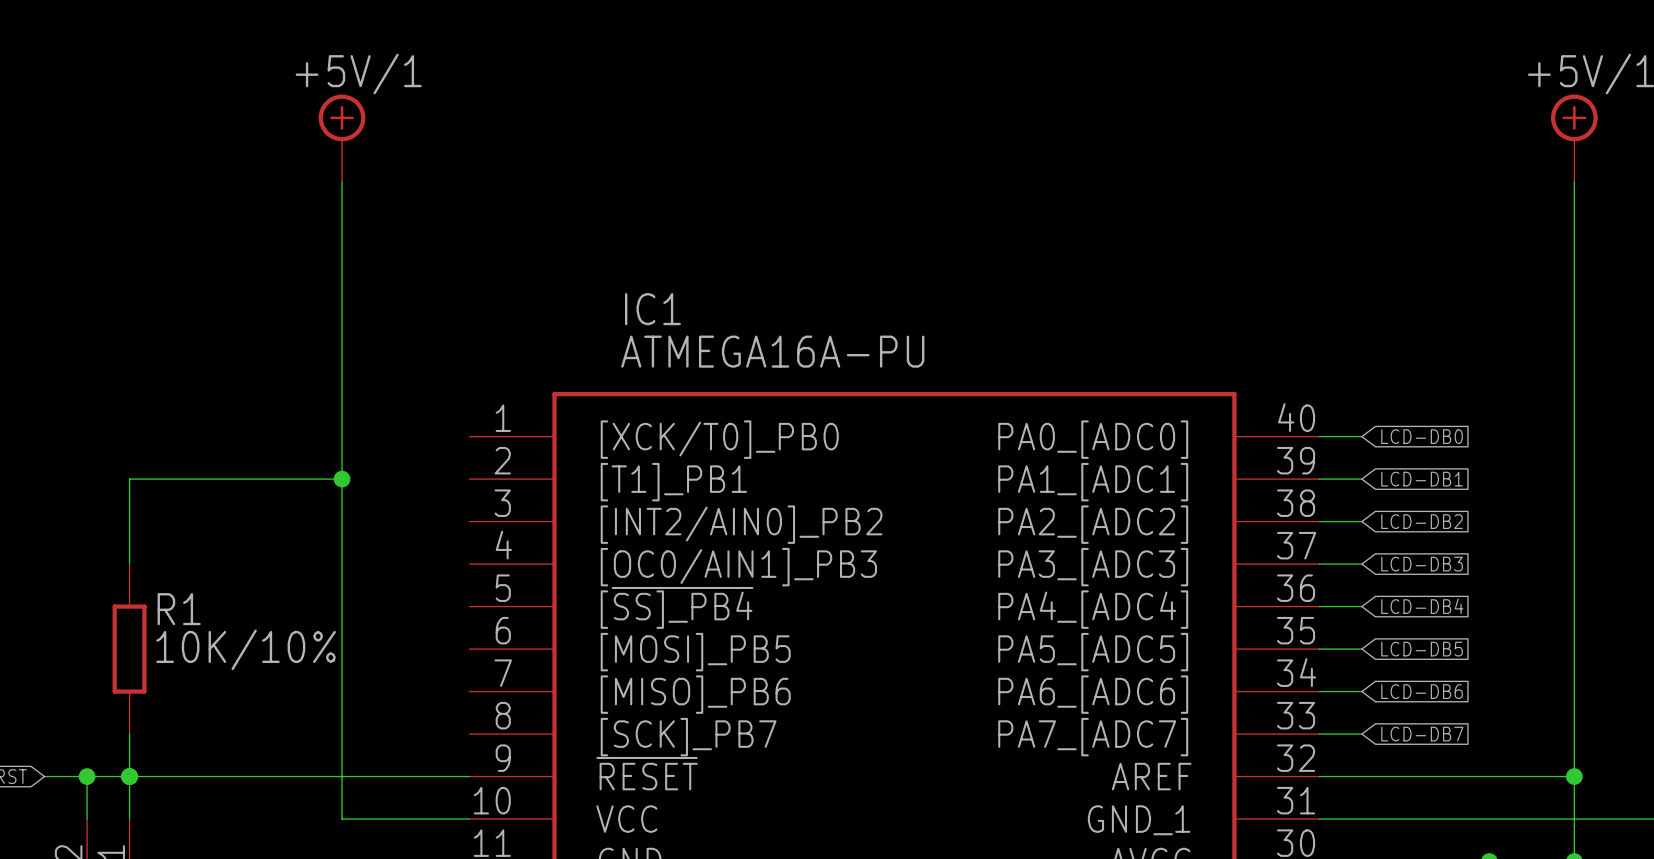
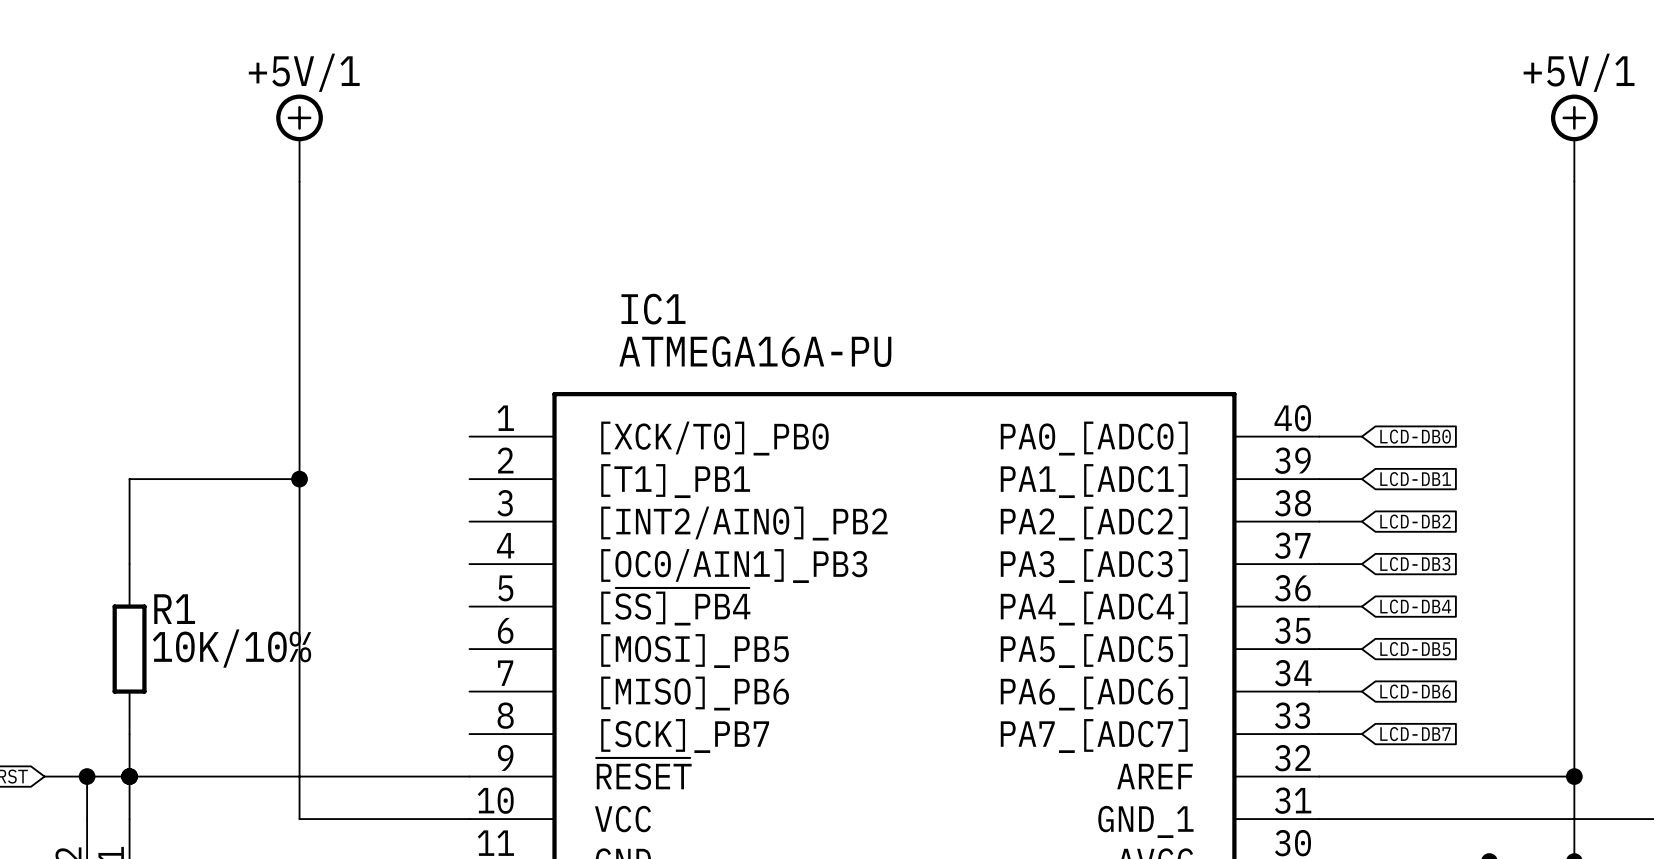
power symbol position: +5V/1 (342, 138) -> +5V/1 (299, 138)
wire: (342, 181) (342, 819) -> (299, 181) (299, 819) (342, 819)
wire: (299, 479) (342, 479) -> none
junction position: (342, 479) -> (299, 479)

